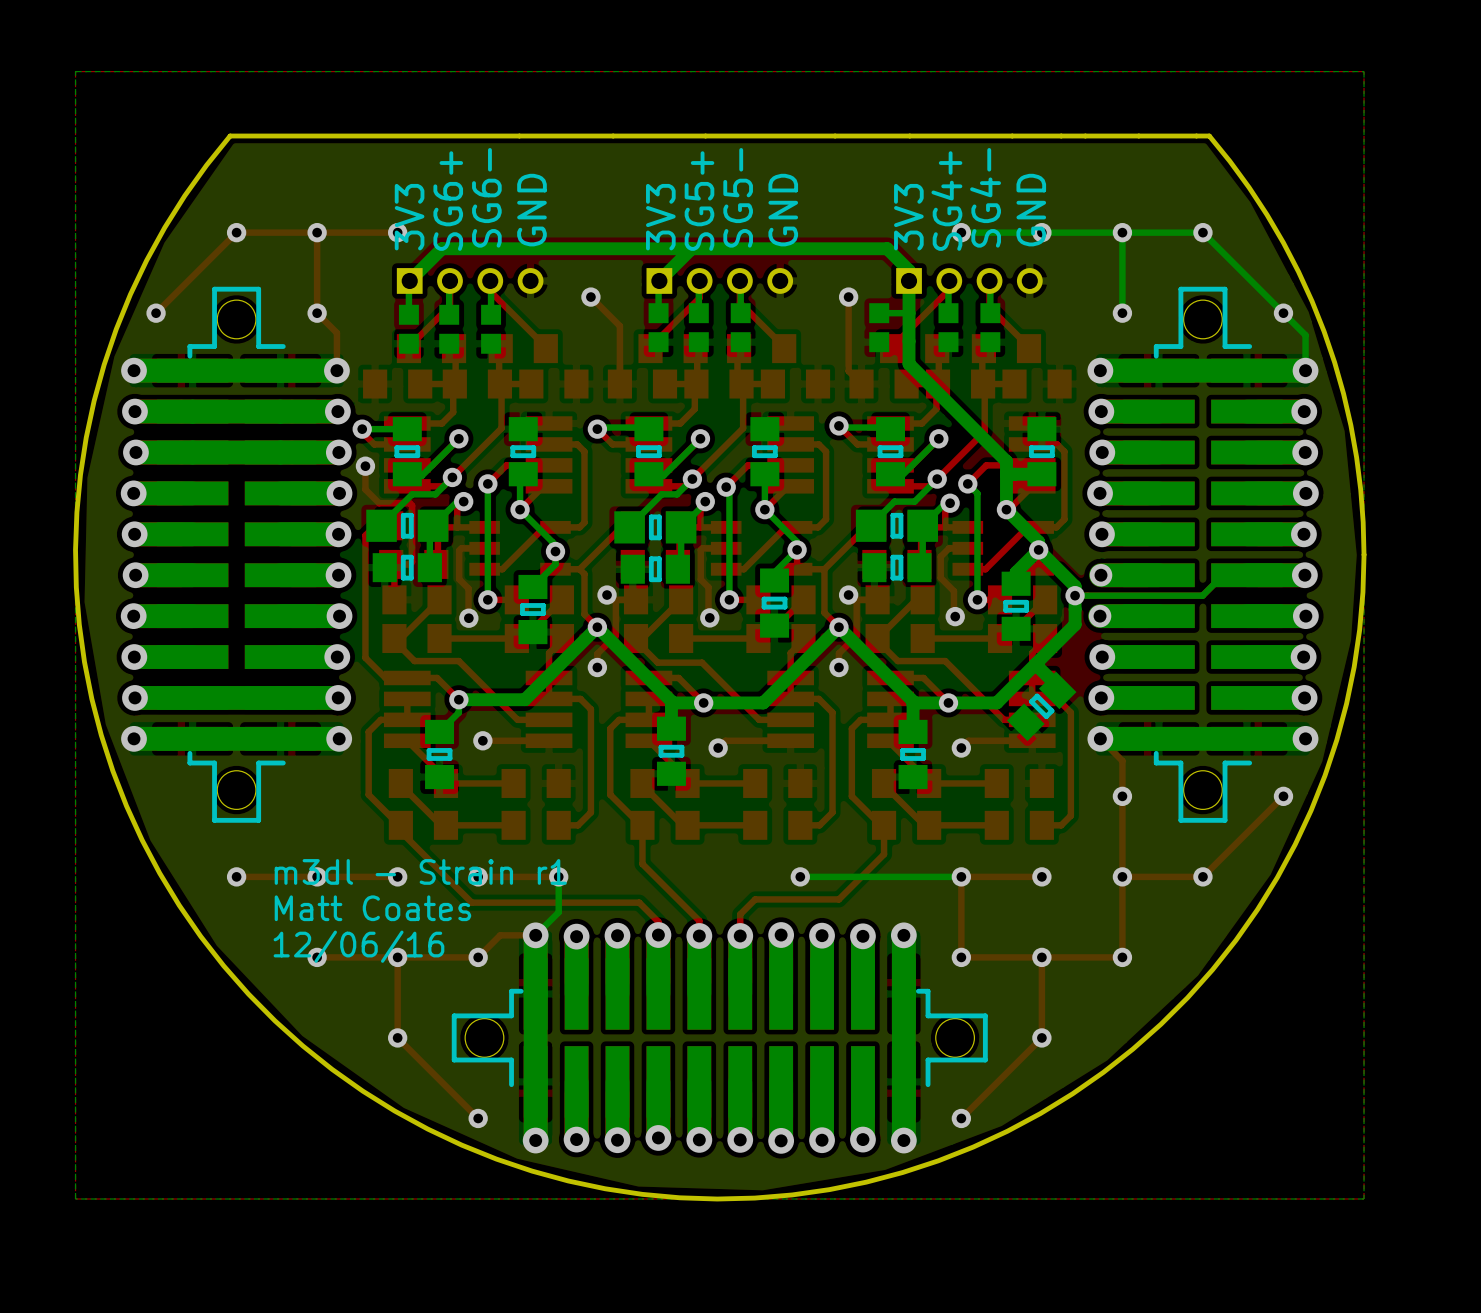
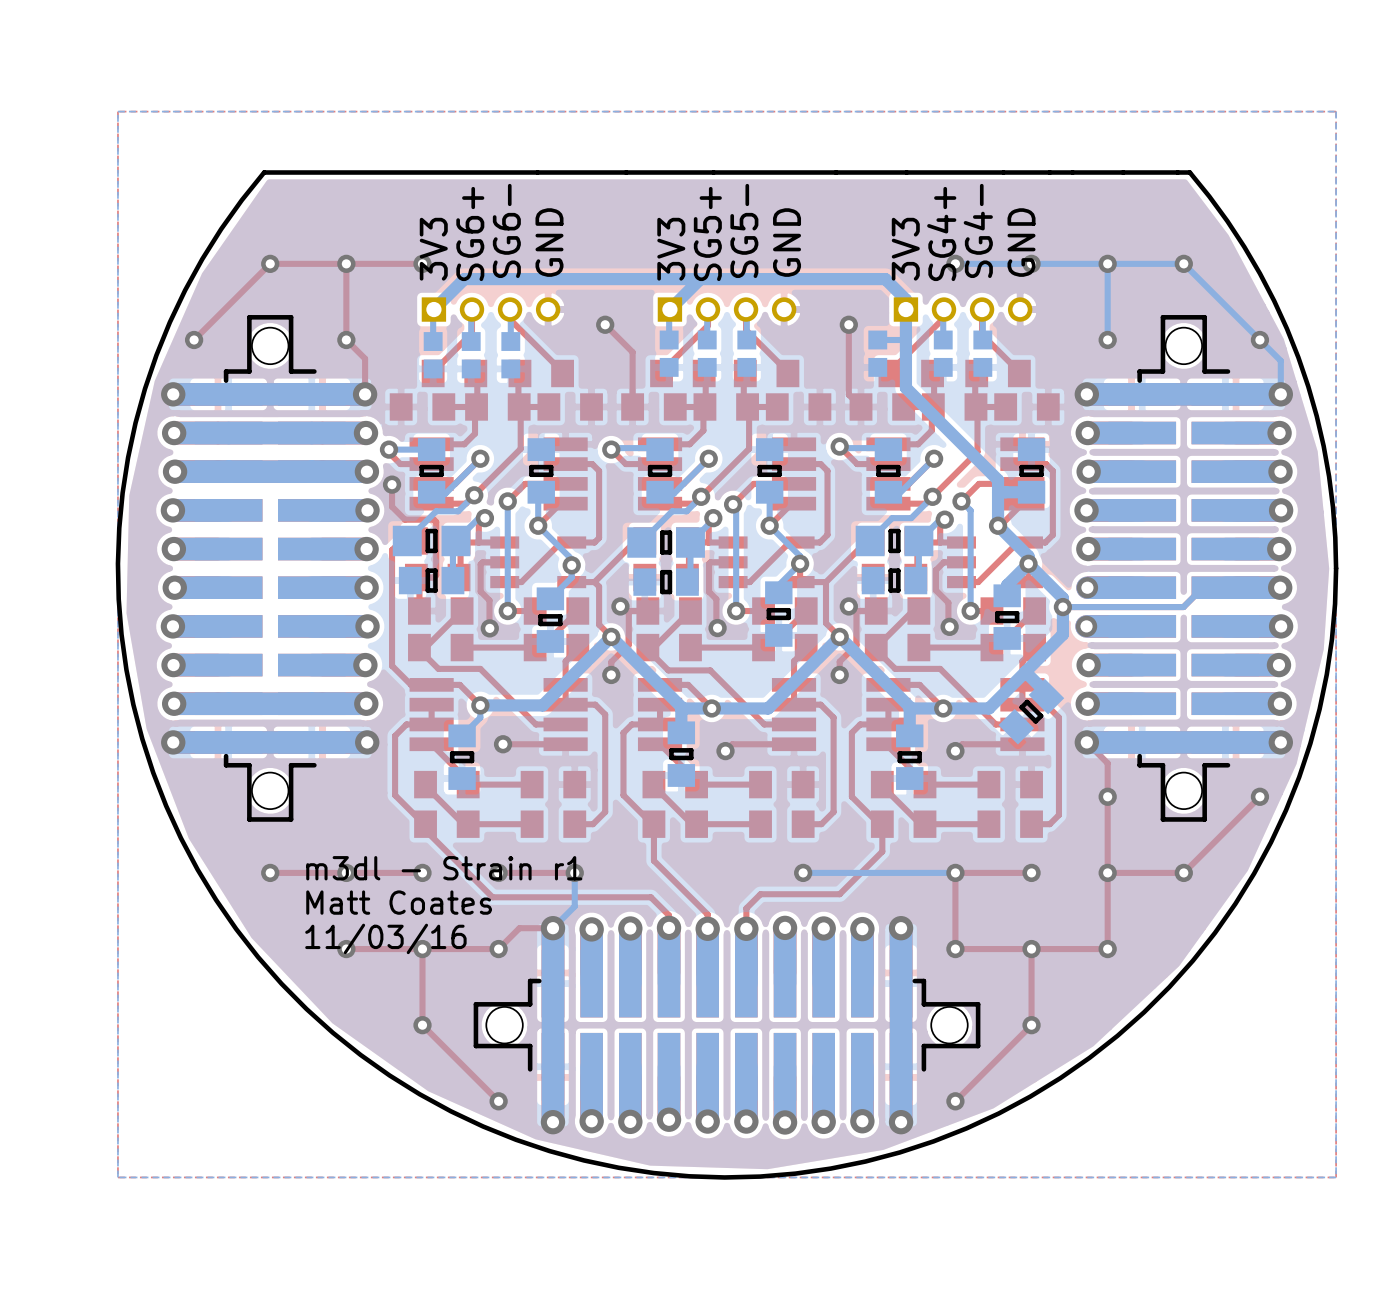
text: 12/06/16 (358, 946) -> 11/03/16 (385, 938)

